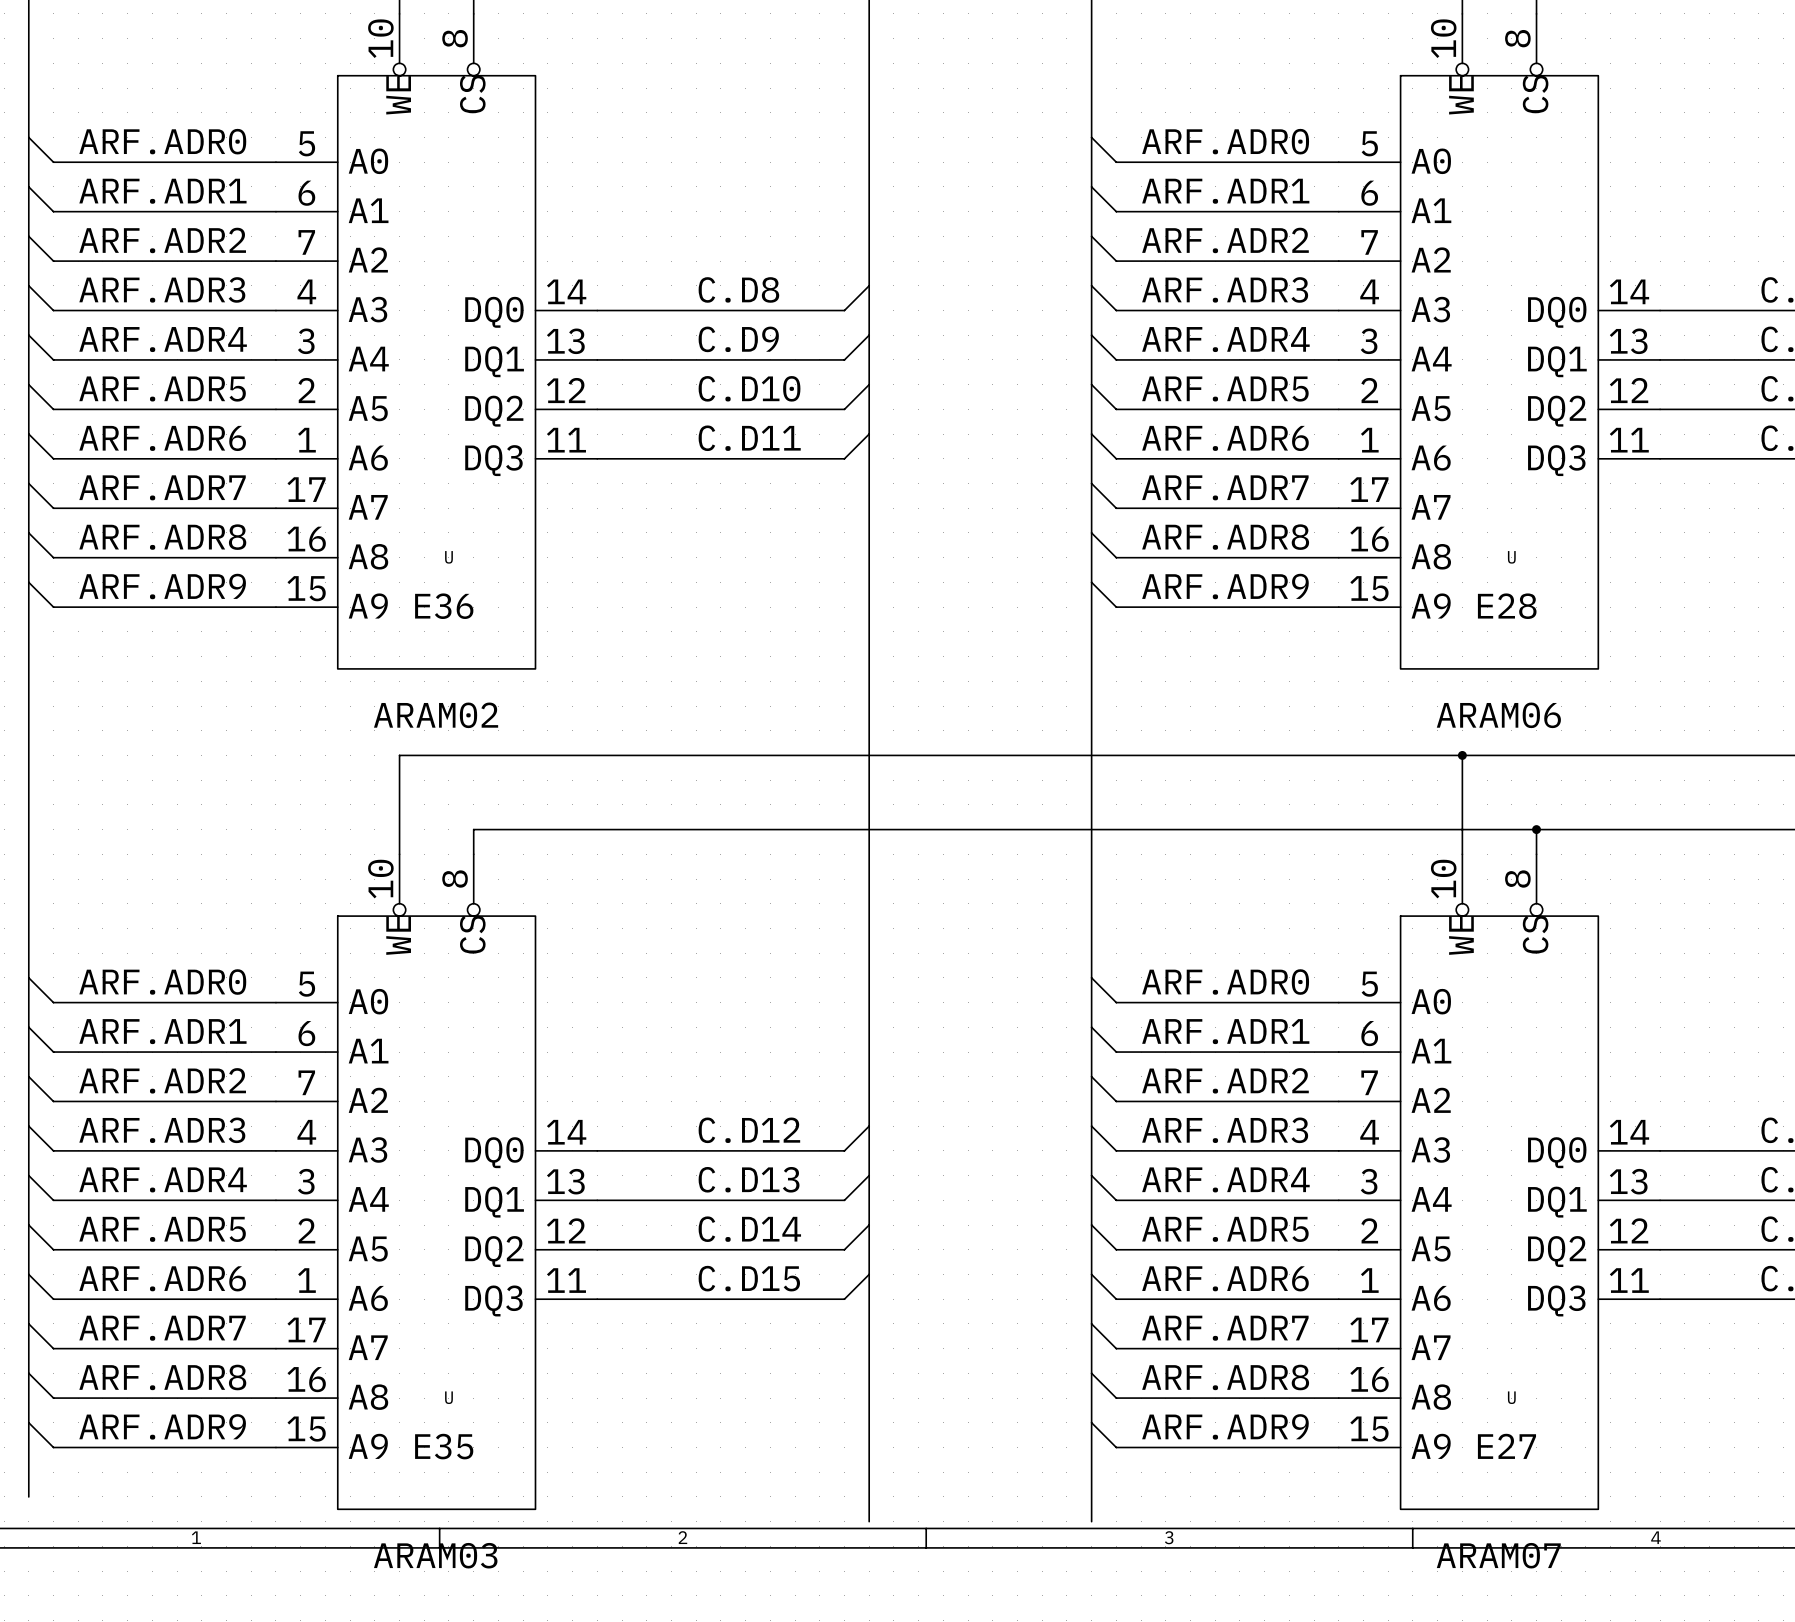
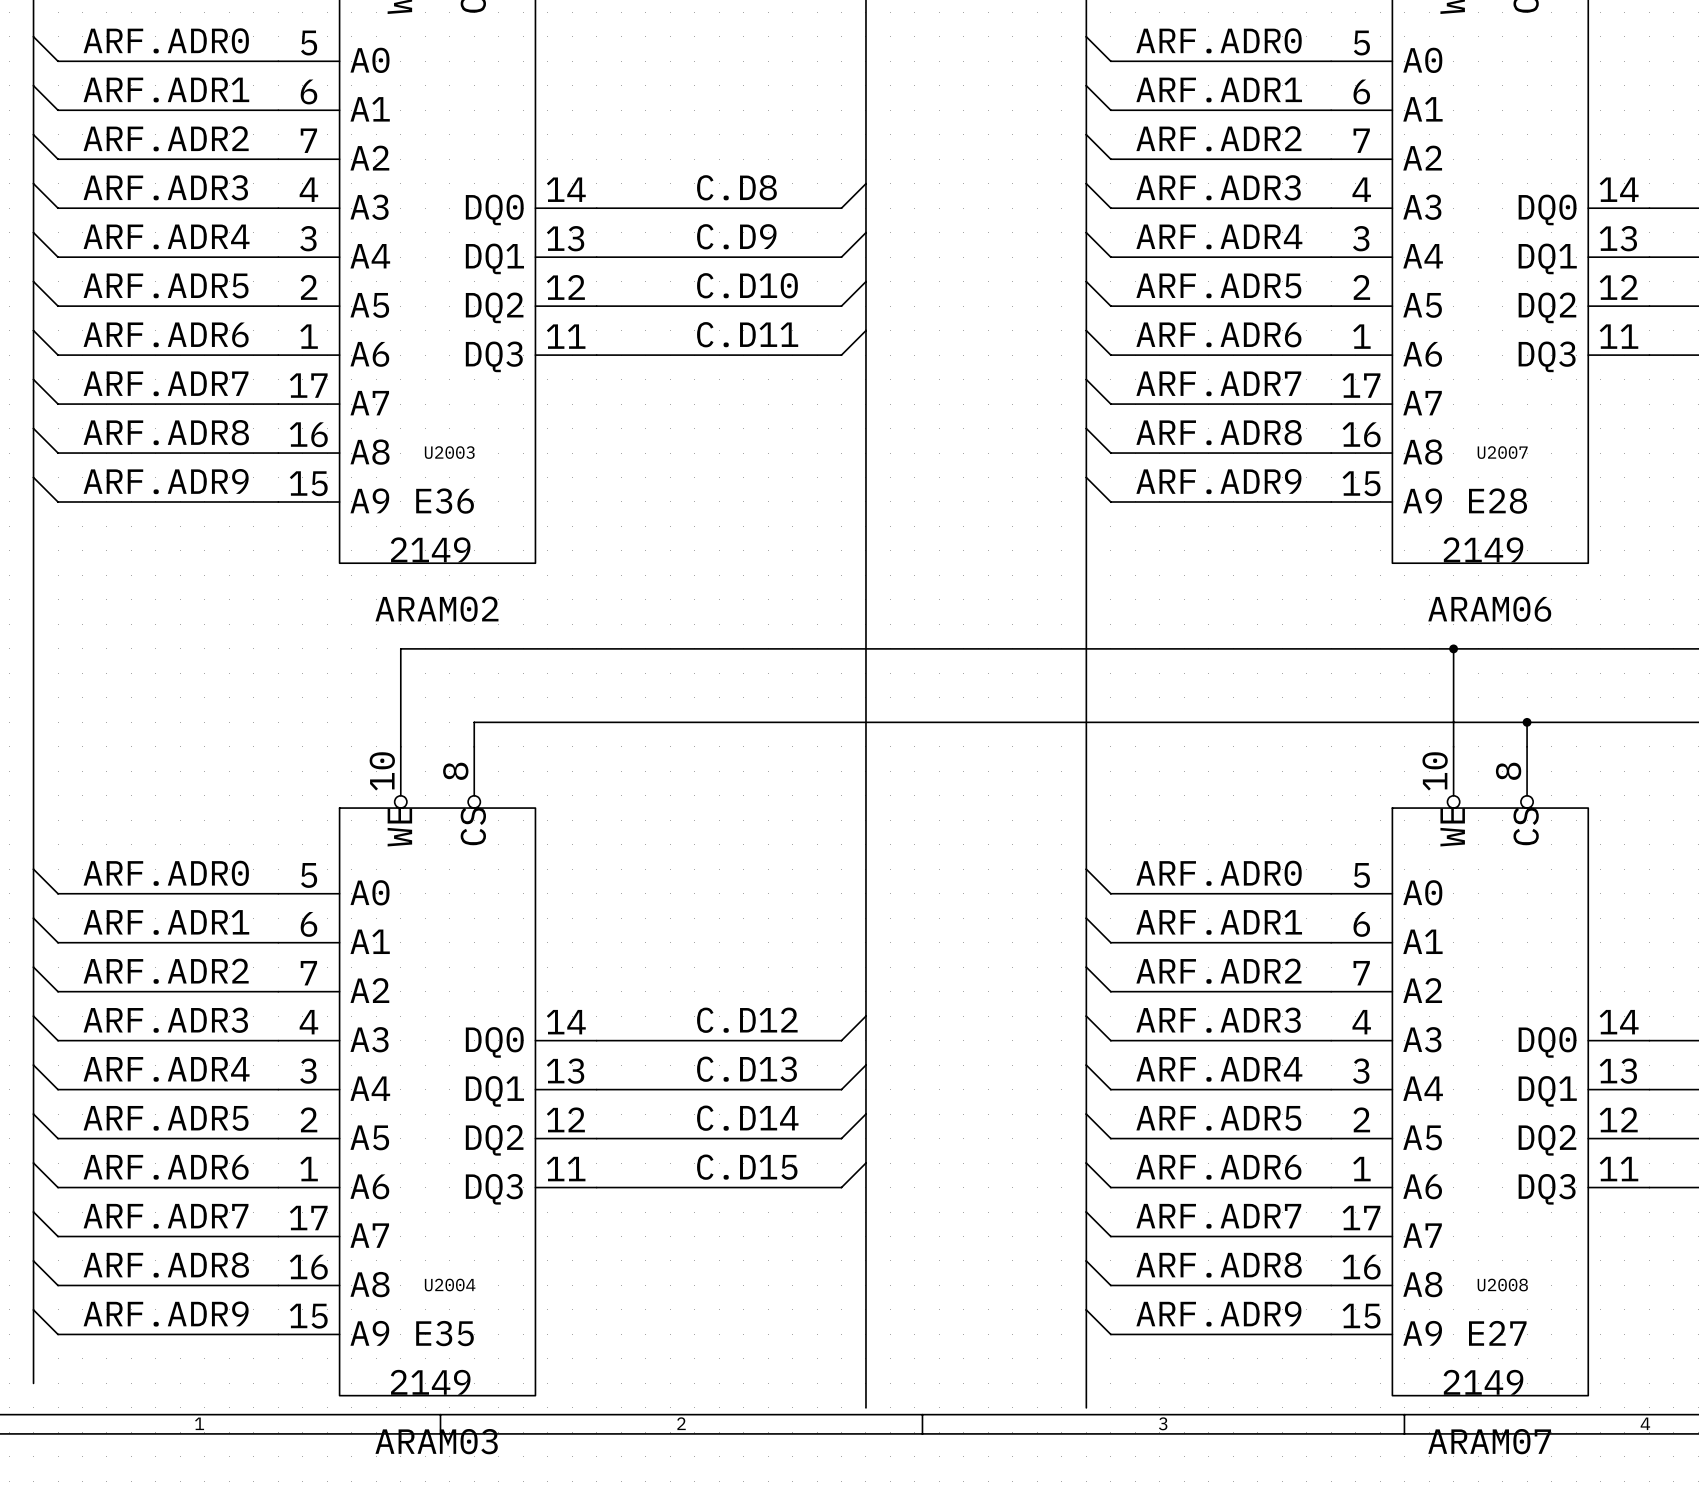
U name: U (448, 557) -> U2003 (449, 452)
U name: U (1511, 557) -> U2007 (1502, 452)
U value: none -> 2149 (430, 549)
U value: none -> 2149 (1483, 549)
U name: U (448, 1397) -> U2004 (450, 1285)
U name: U (1511, 1397) -> U2008 (1502, 1285)
U value: none -> 2149 (430, 1382)
U value: none -> 2149 (1483, 1382)

